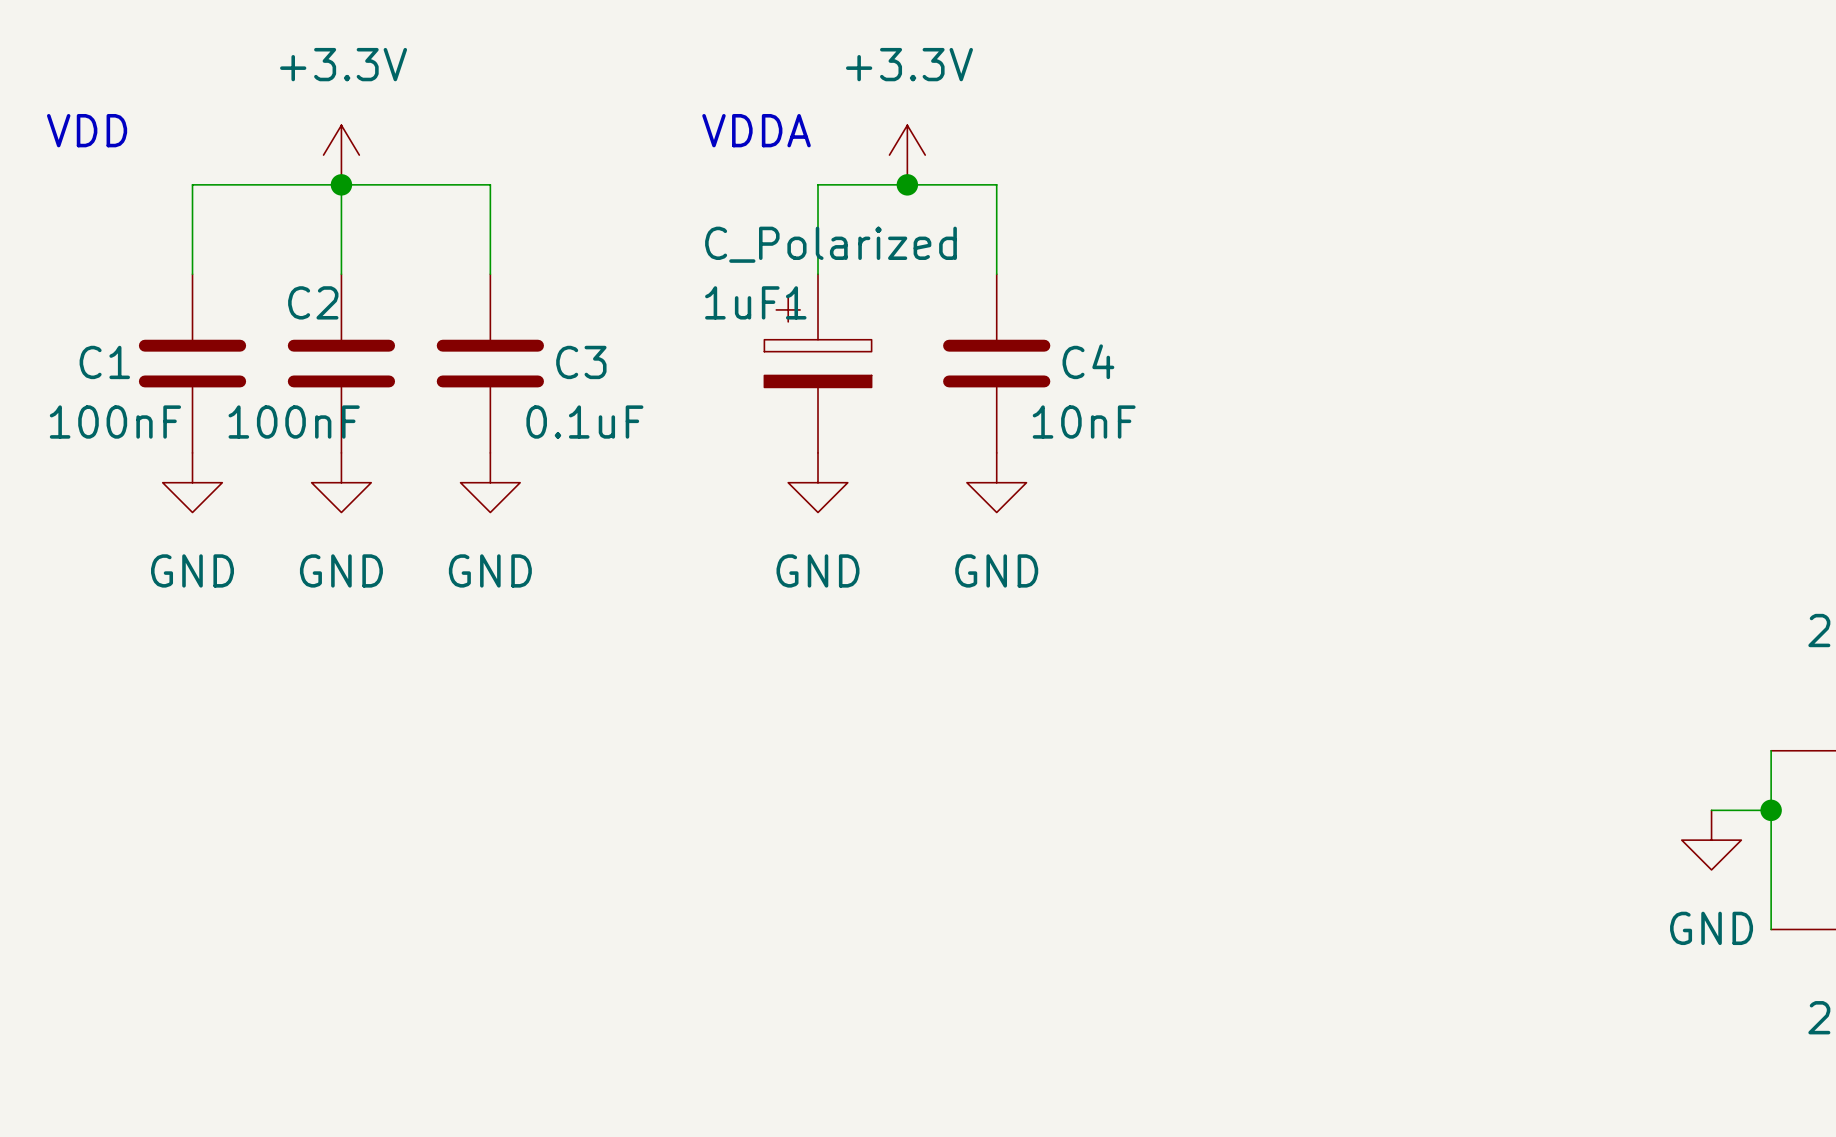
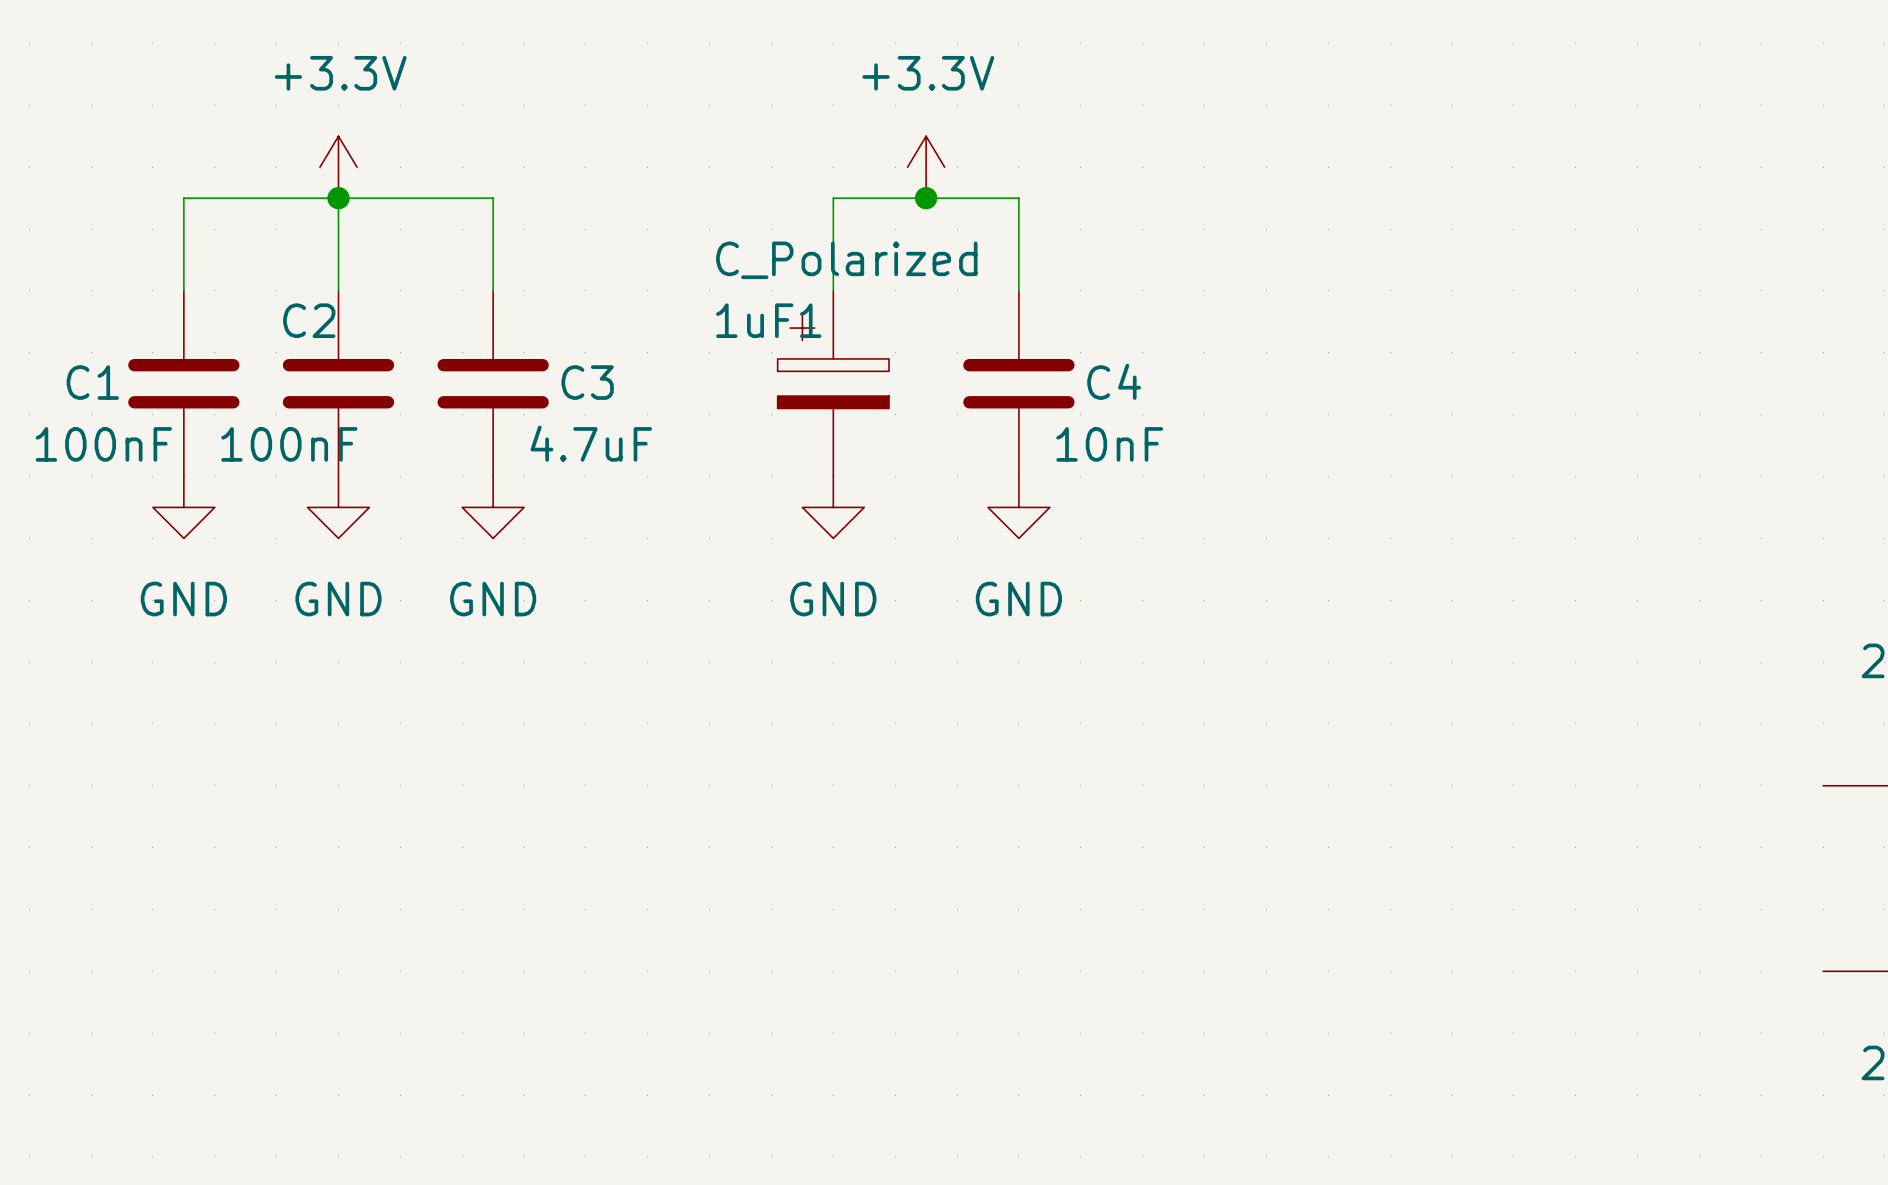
text: VDD (87, 130) -> none
text: VDDA (756, 130) -> none
C3 value: 0.1uF (584, 422) -> 4.7uF (591, 443)
wire: (1771, 750) (1771, 929) -> none
wire: (1711, 810) (1771, 810) -> none
junction: (1771, 810) -> none
power symbol: GND (1711, 840) -> none

